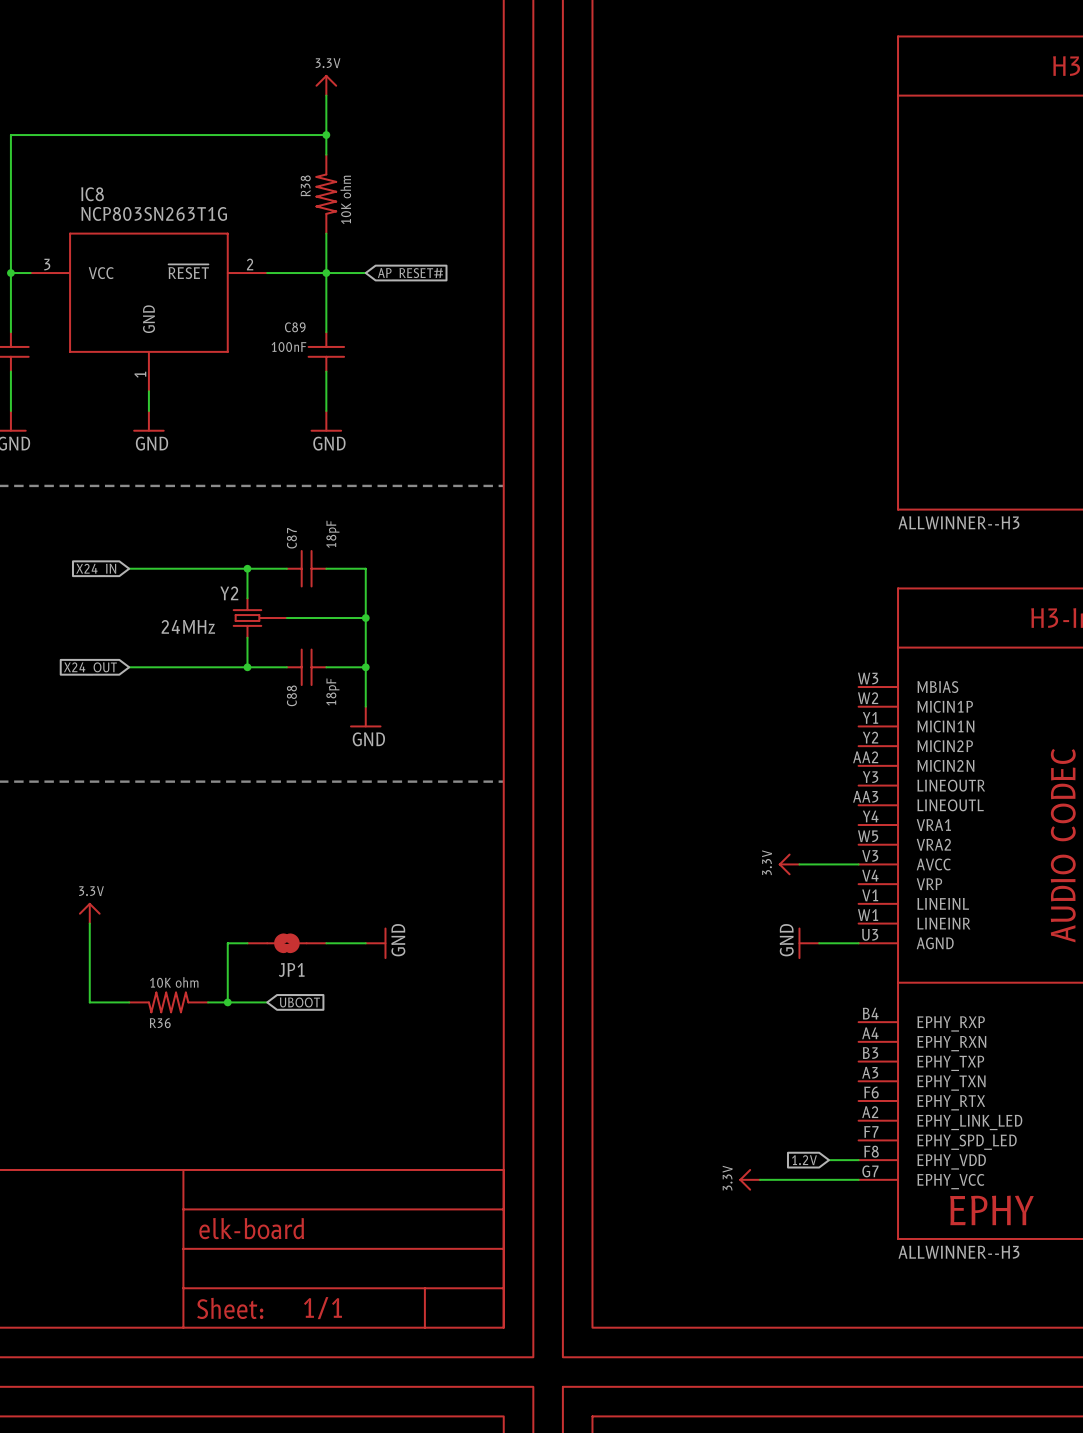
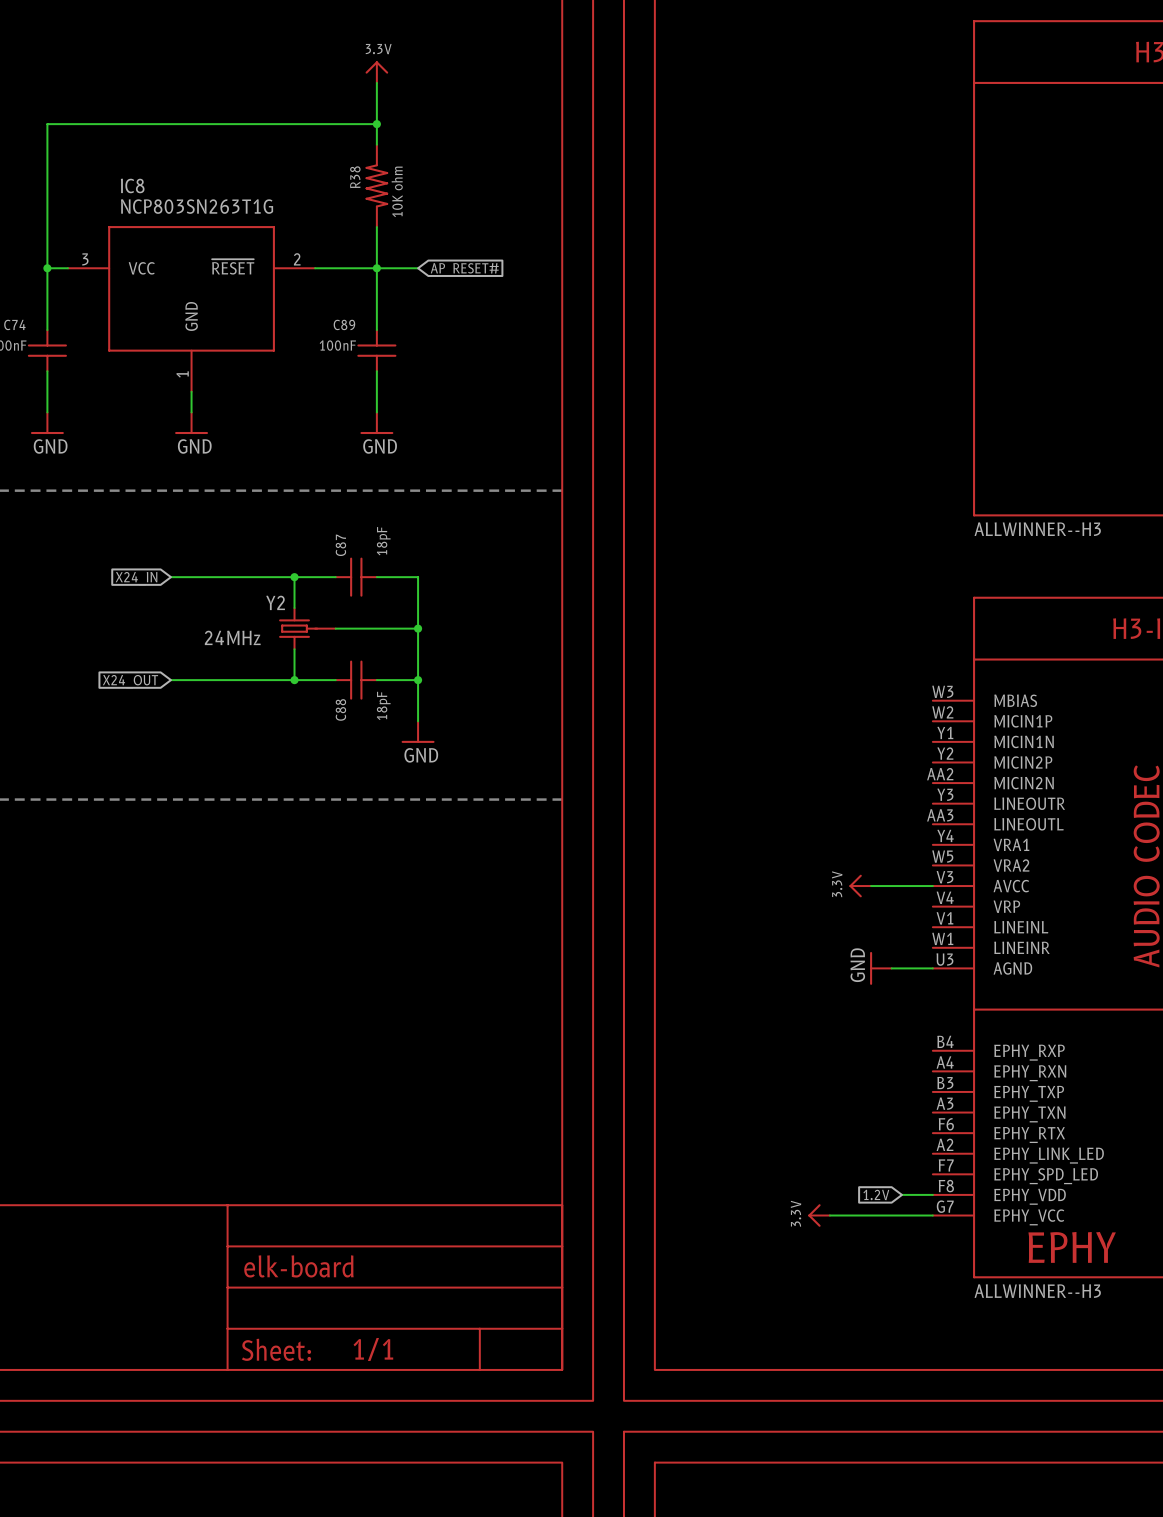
power symbol: 3.3V (89, 913) -> none
wire: (89, 923) (89, 1002) (129, 1002) -> none
wire: (247, 943) (227, 943) (227, 1002) -> none
JP1: (286, 943) -> none
wire: (326, 943) (365, 943) -> none
power symbol: GND (376, 943) -> none
R36: 10K ohm (168, 1002) -> none
wire: (208, 1002) (267, 1002) -> none
junction: (227, 1002) -> none
global label: UBOOT (299, 1002) -> none

